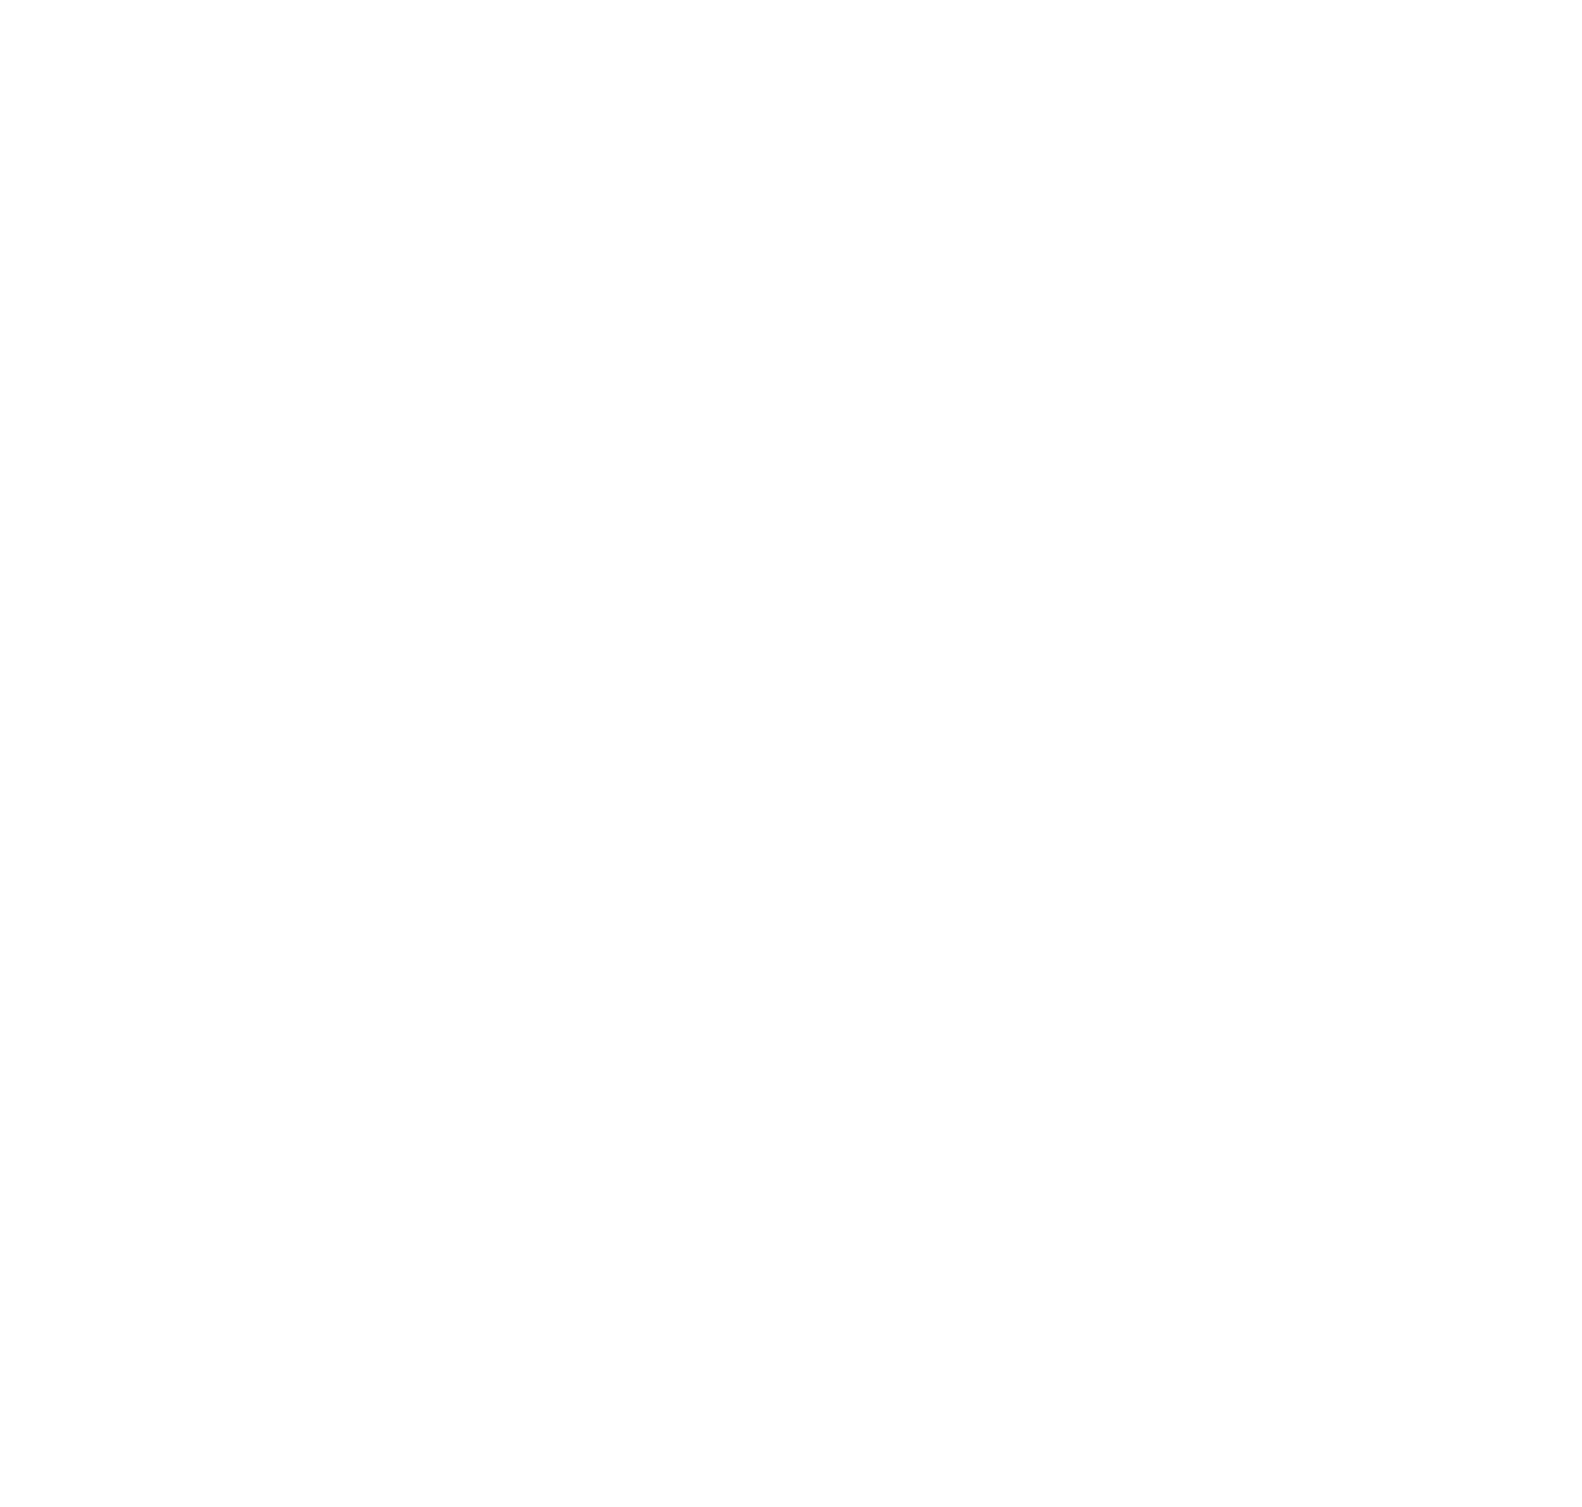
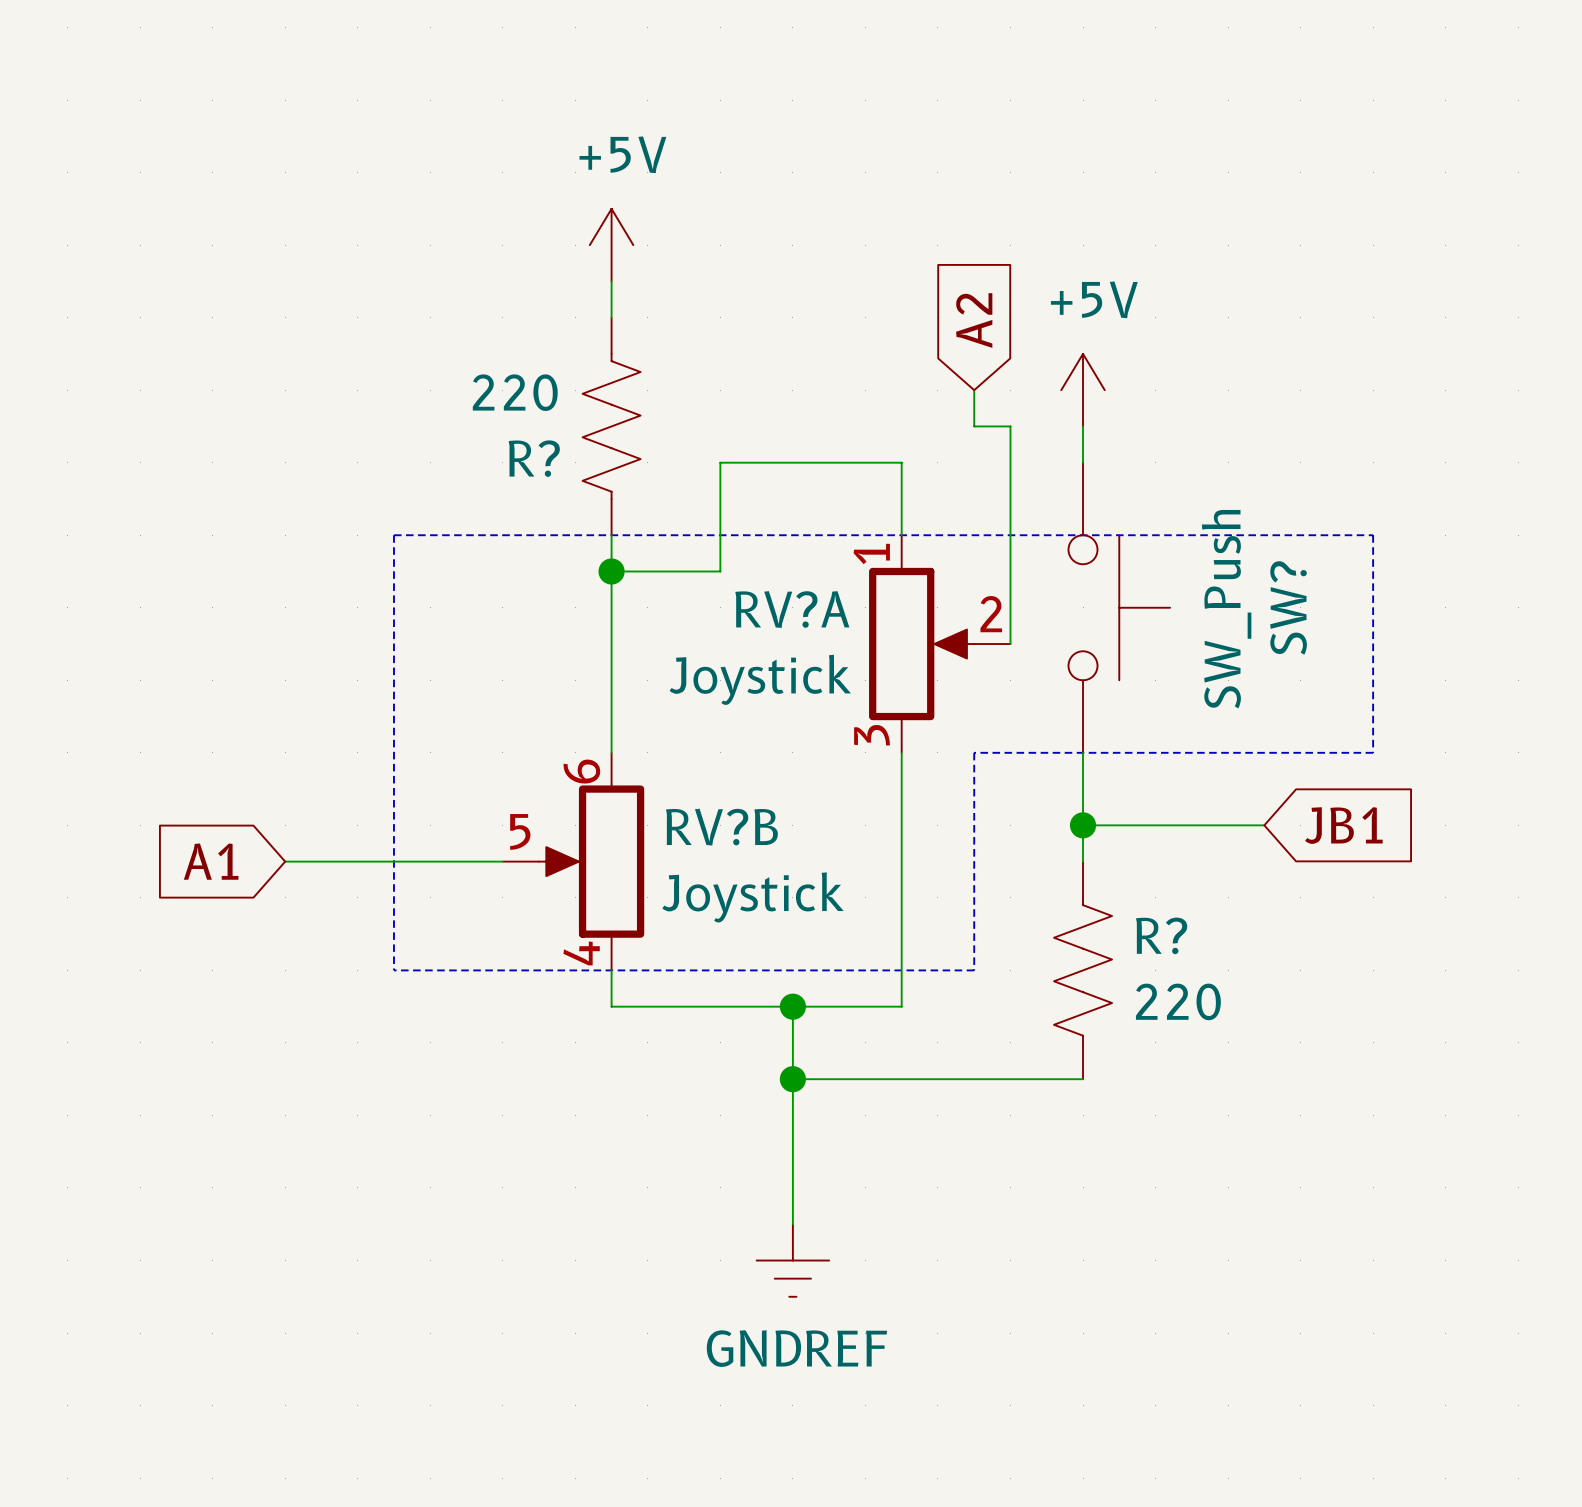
power symbol: none -> +5V (611, 245)
wire: none -> (611, 281) (611, 317)
global label: none -> A2 (974, 320)
wire: none -> (974, 390) (974, 426) (1010, 426) (1010, 644)
power symbol: none -> +5V (1083, 390)
R?: none -> 220 (611, 426)
wire: none -> (1083, 426) (1083, 462)
line: none -> (393, 535) (1373, 535) (1373, 752) (974, 752) (974, 970) (393, 970) (393, 535)
wire: none -> (611, 535) (611, 752)
wire: none -> (901, 535) (901, 462) (720, 462) (720, 571) (611, 571)
junction: none -> (611, 571)
SW?: none -> SW_Push (1119, 607)
RV?A: none -> Joystick (939, 644)
wire: none -> (901, 752) (901, 1006) (611, 1006) (611, 970)
wire: none -> (1083, 752) (1083, 861)
wire: none -> (1083, 825) (1264, 825)
junction: none -> (1083, 825)
global label: none -> JB1 (1343, 825)
global label: none -> A1 (211, 861)
wire: none -> (285, 861) (502, 861)
RV?B: none -> Joystick (573, 861)
R?: none -> 220 (1083, 970)
wire: none -> (792, 1006) (792, 1224)
junction: none -> (792, 1006)
wire: none -> (792, 1079) (1083, 1079)
junction: none -> (792, 1079)
power symbol: none -> GNDREF (792, 1260)

